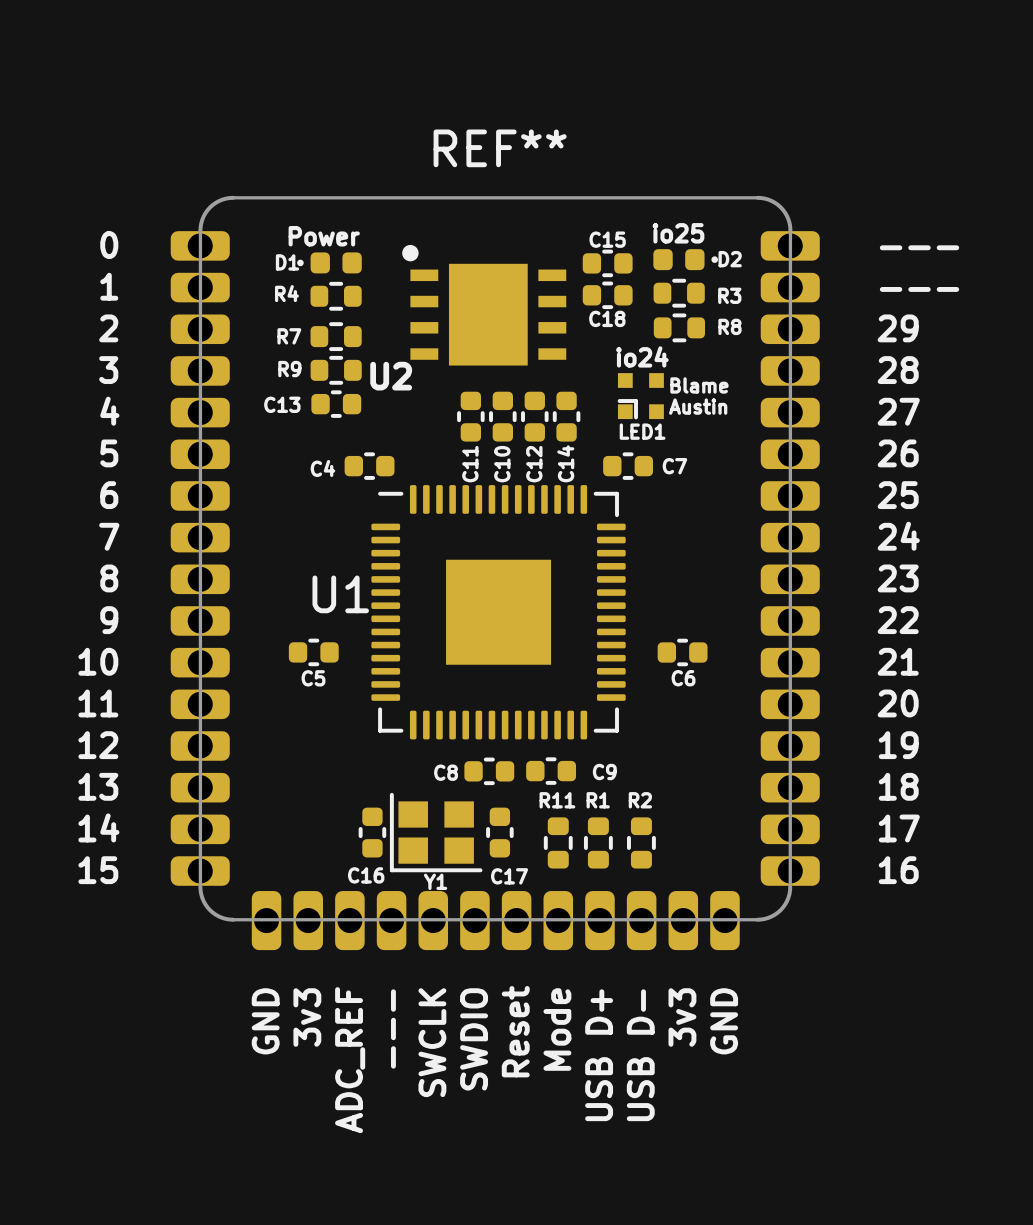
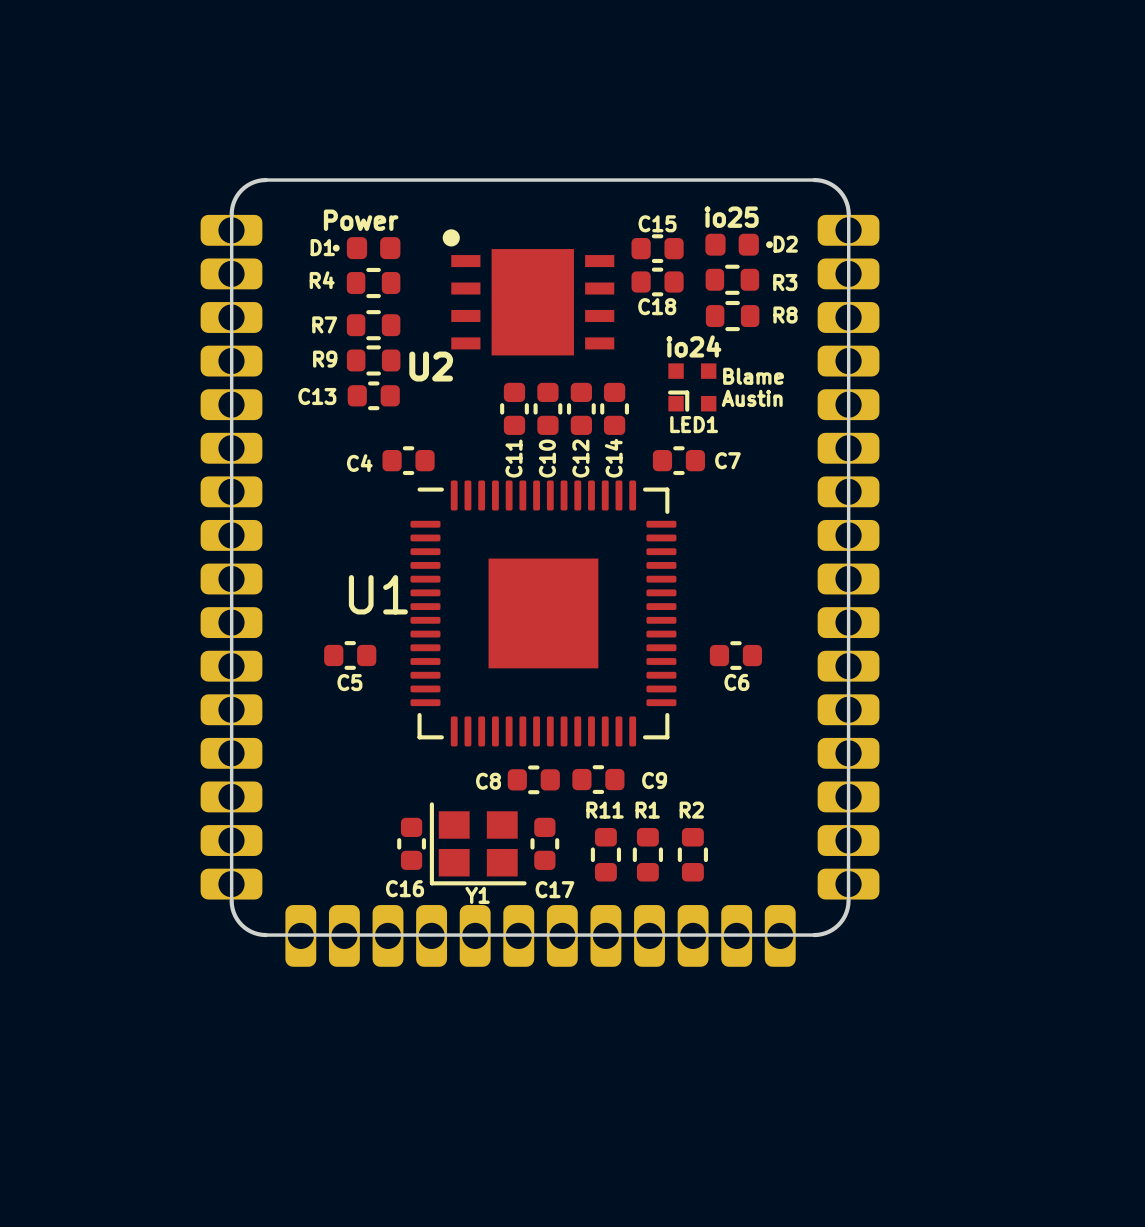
REF** name: REF** (500, 148) -> none
REF** footprint: [170, 195, 820, 951] -> [200, 177, 880, 967]

